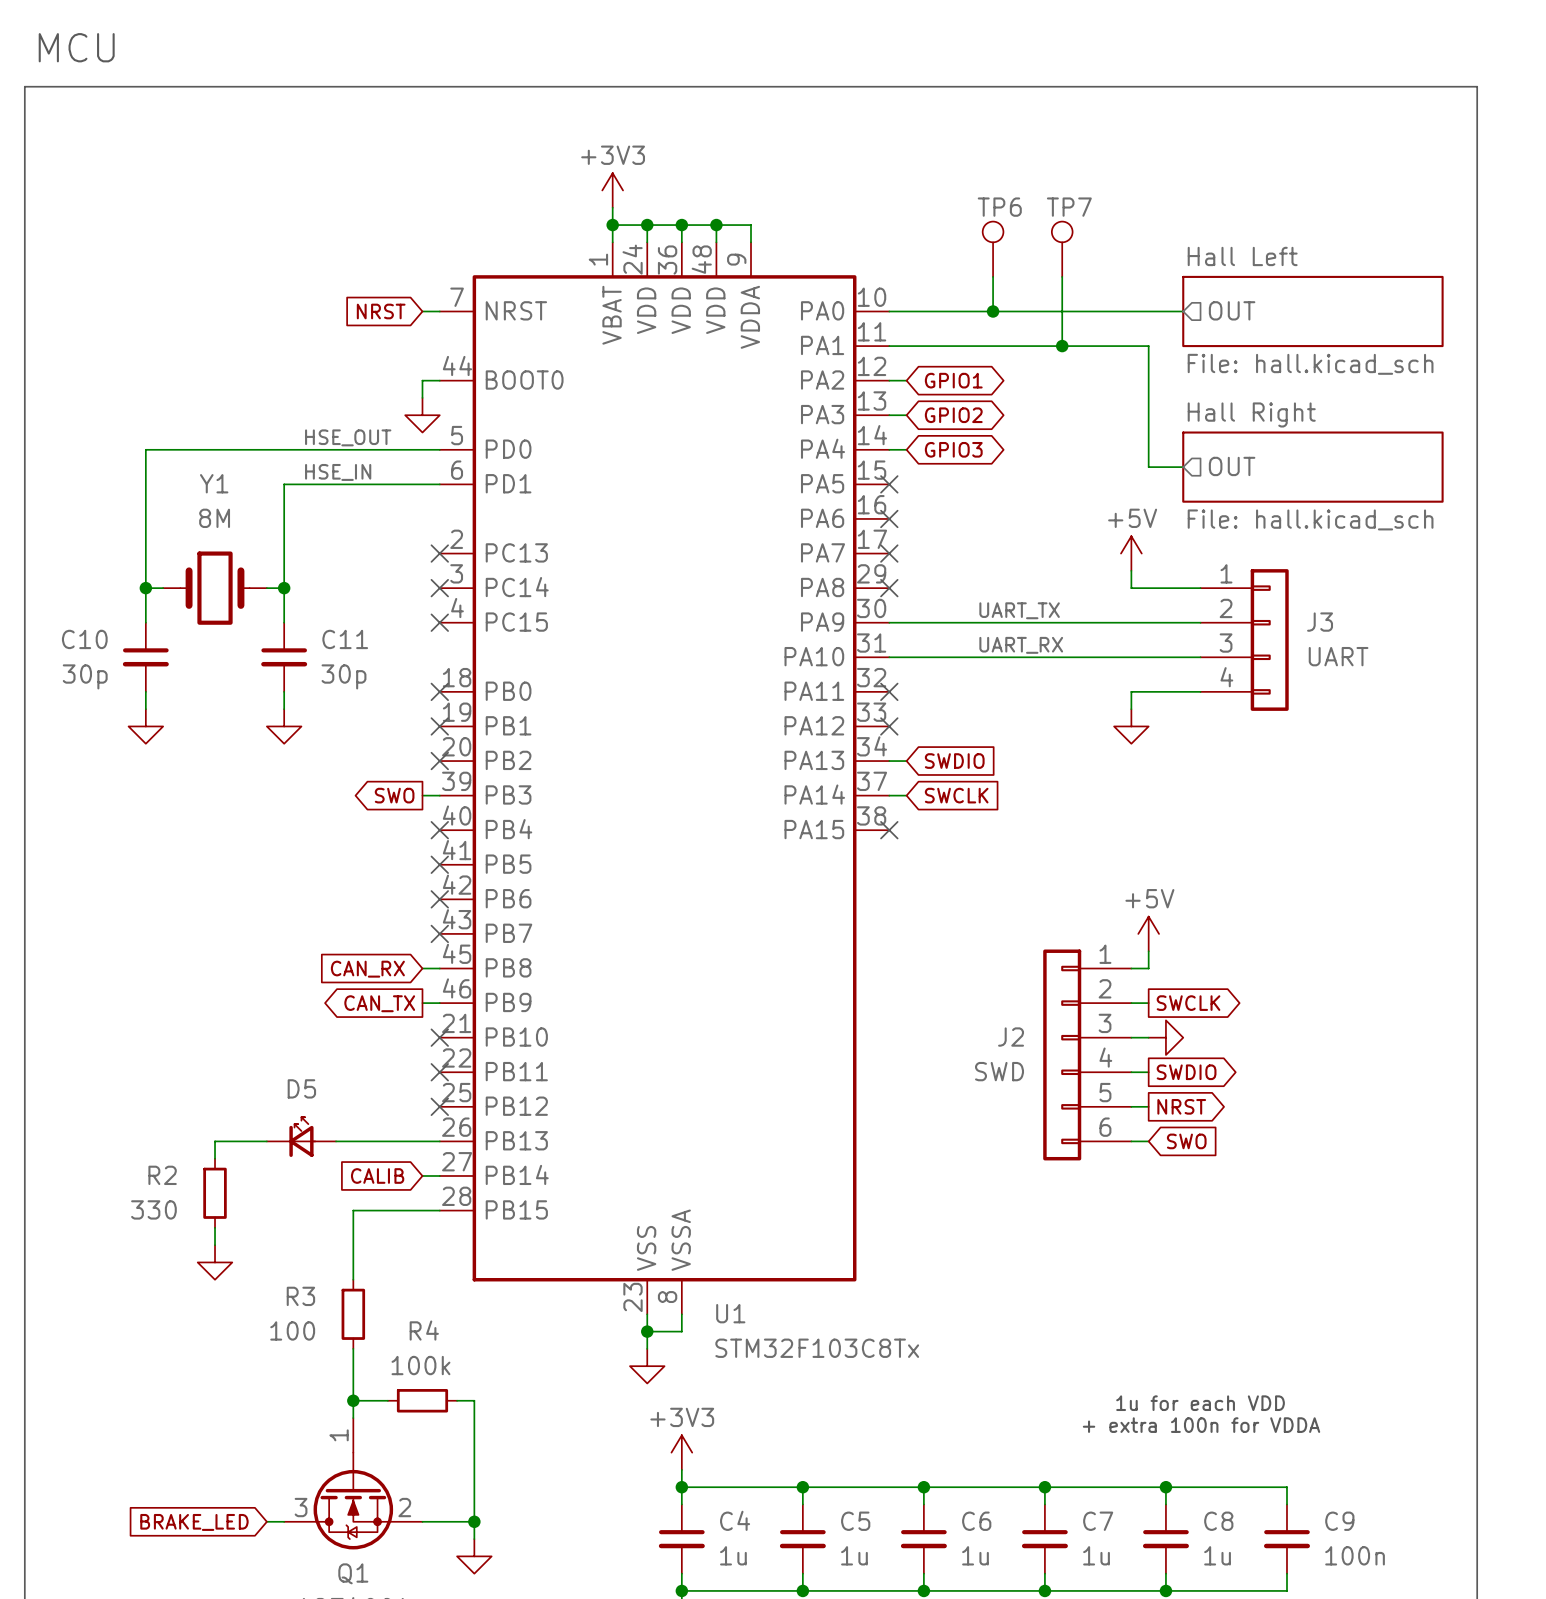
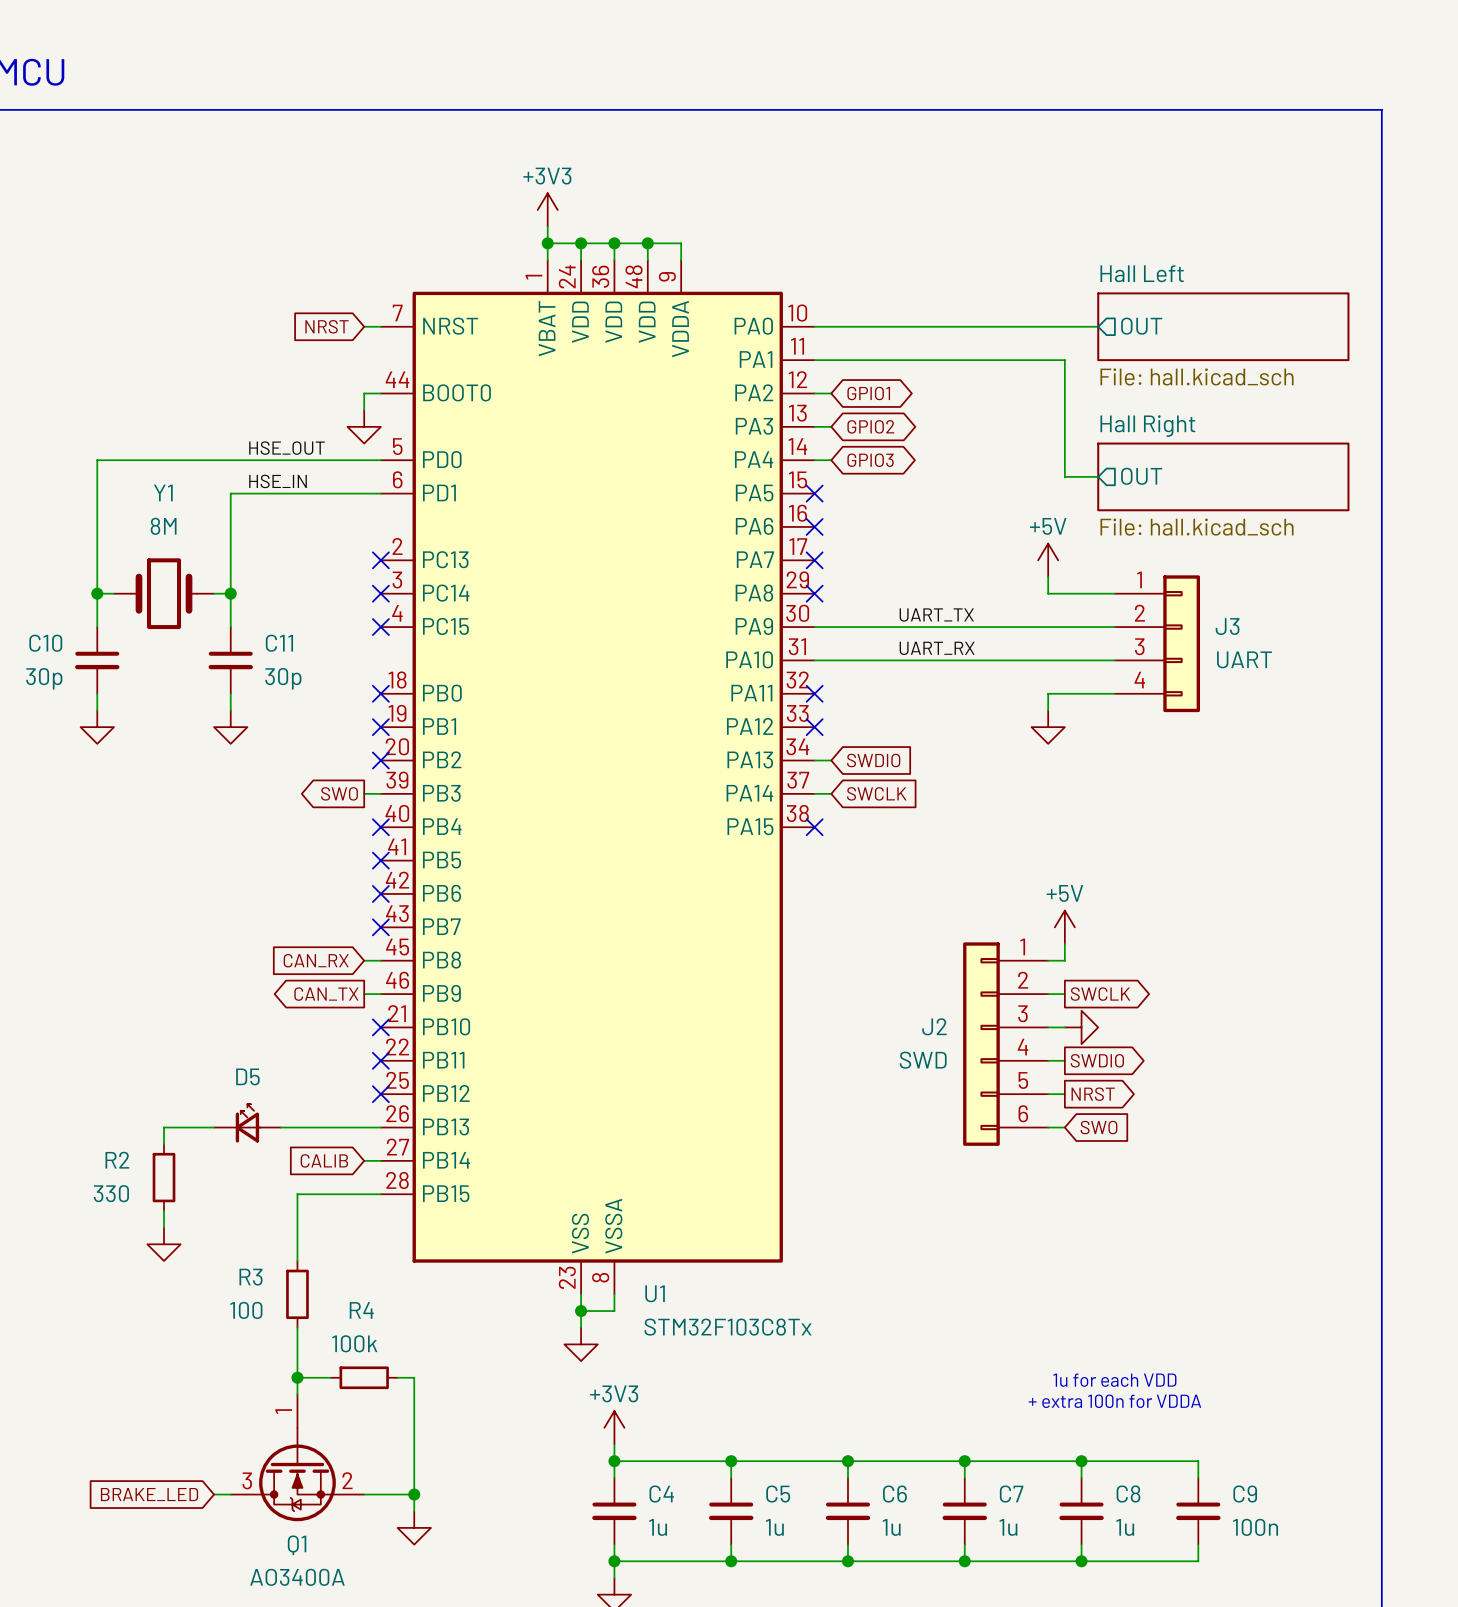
TP6: (993, 249) -> none
TP7: (1062, 249) -> none
wire: (993, 276) (993, 311) -> none
wire: (1062, 276) (1062, 346) -> none
junction: (993, 311) -> none
junction: (1062, 346) -> none

